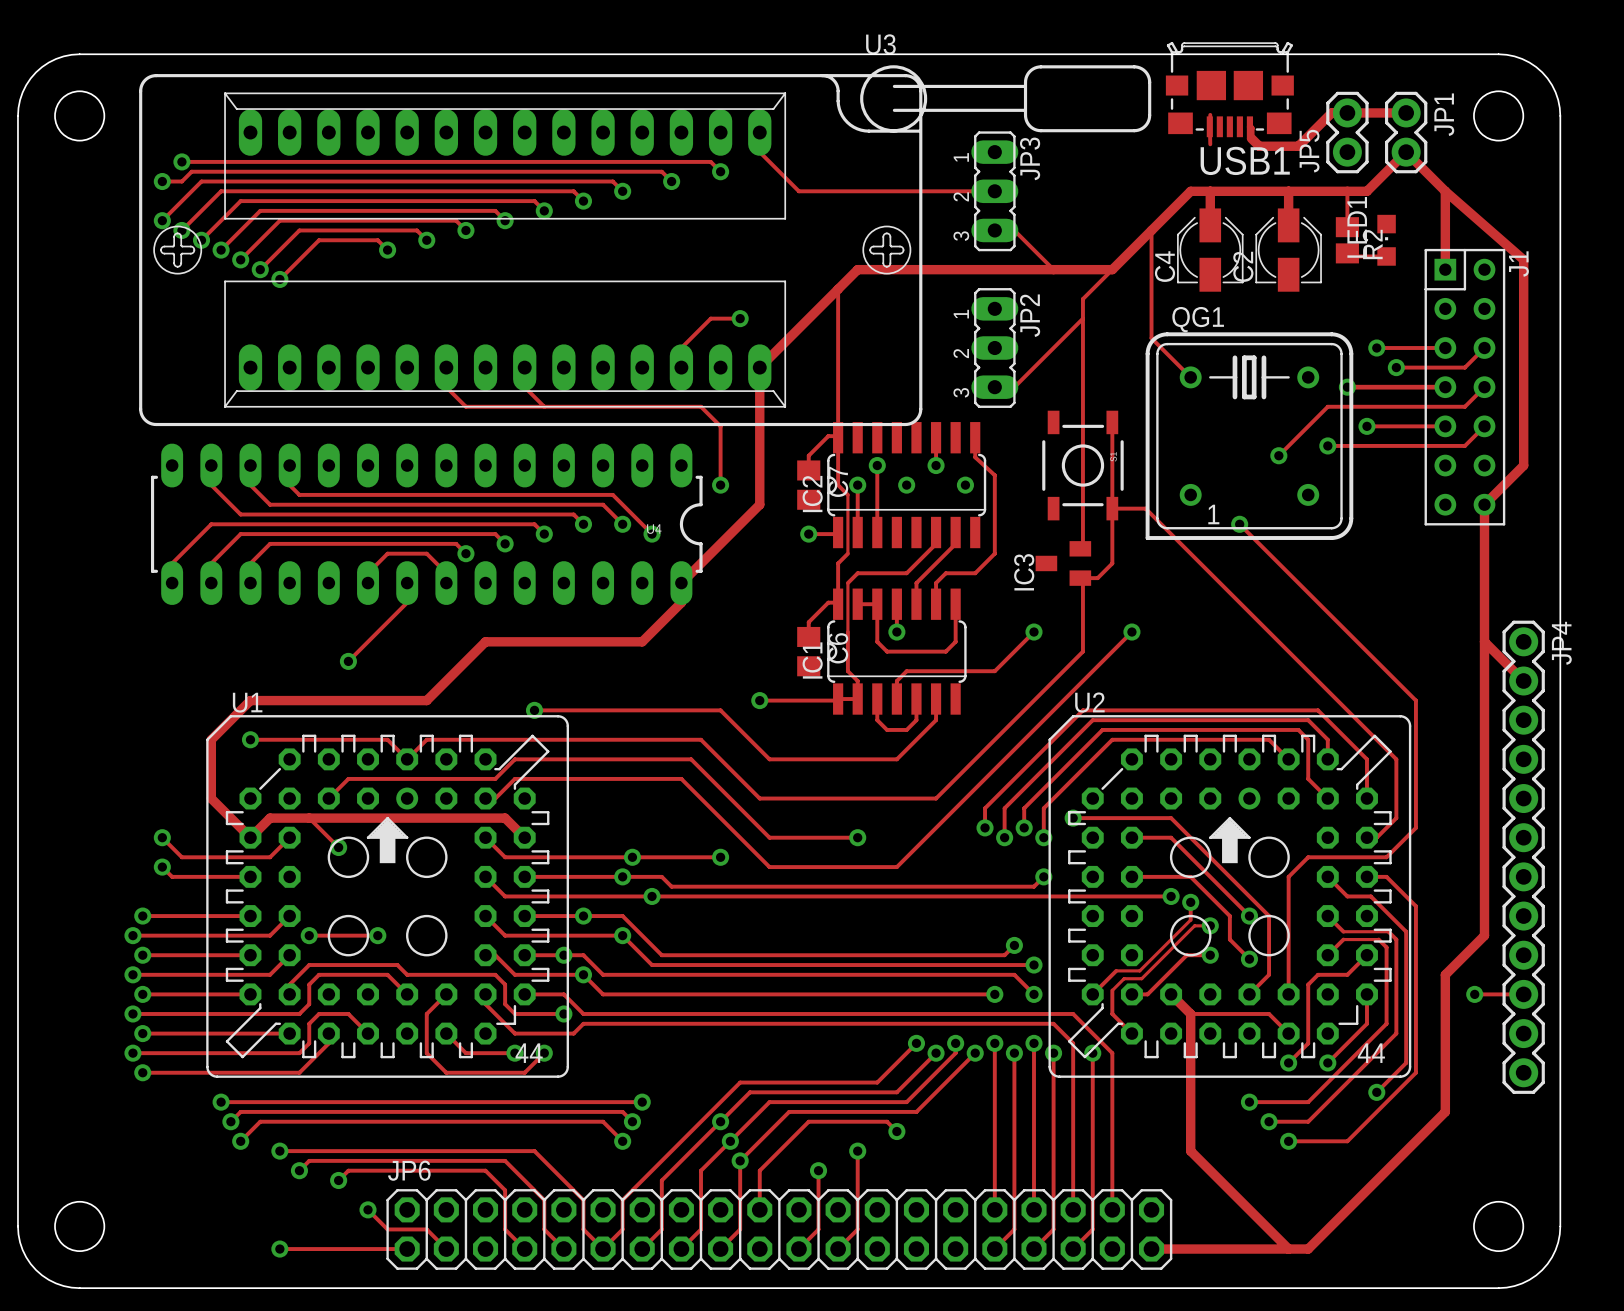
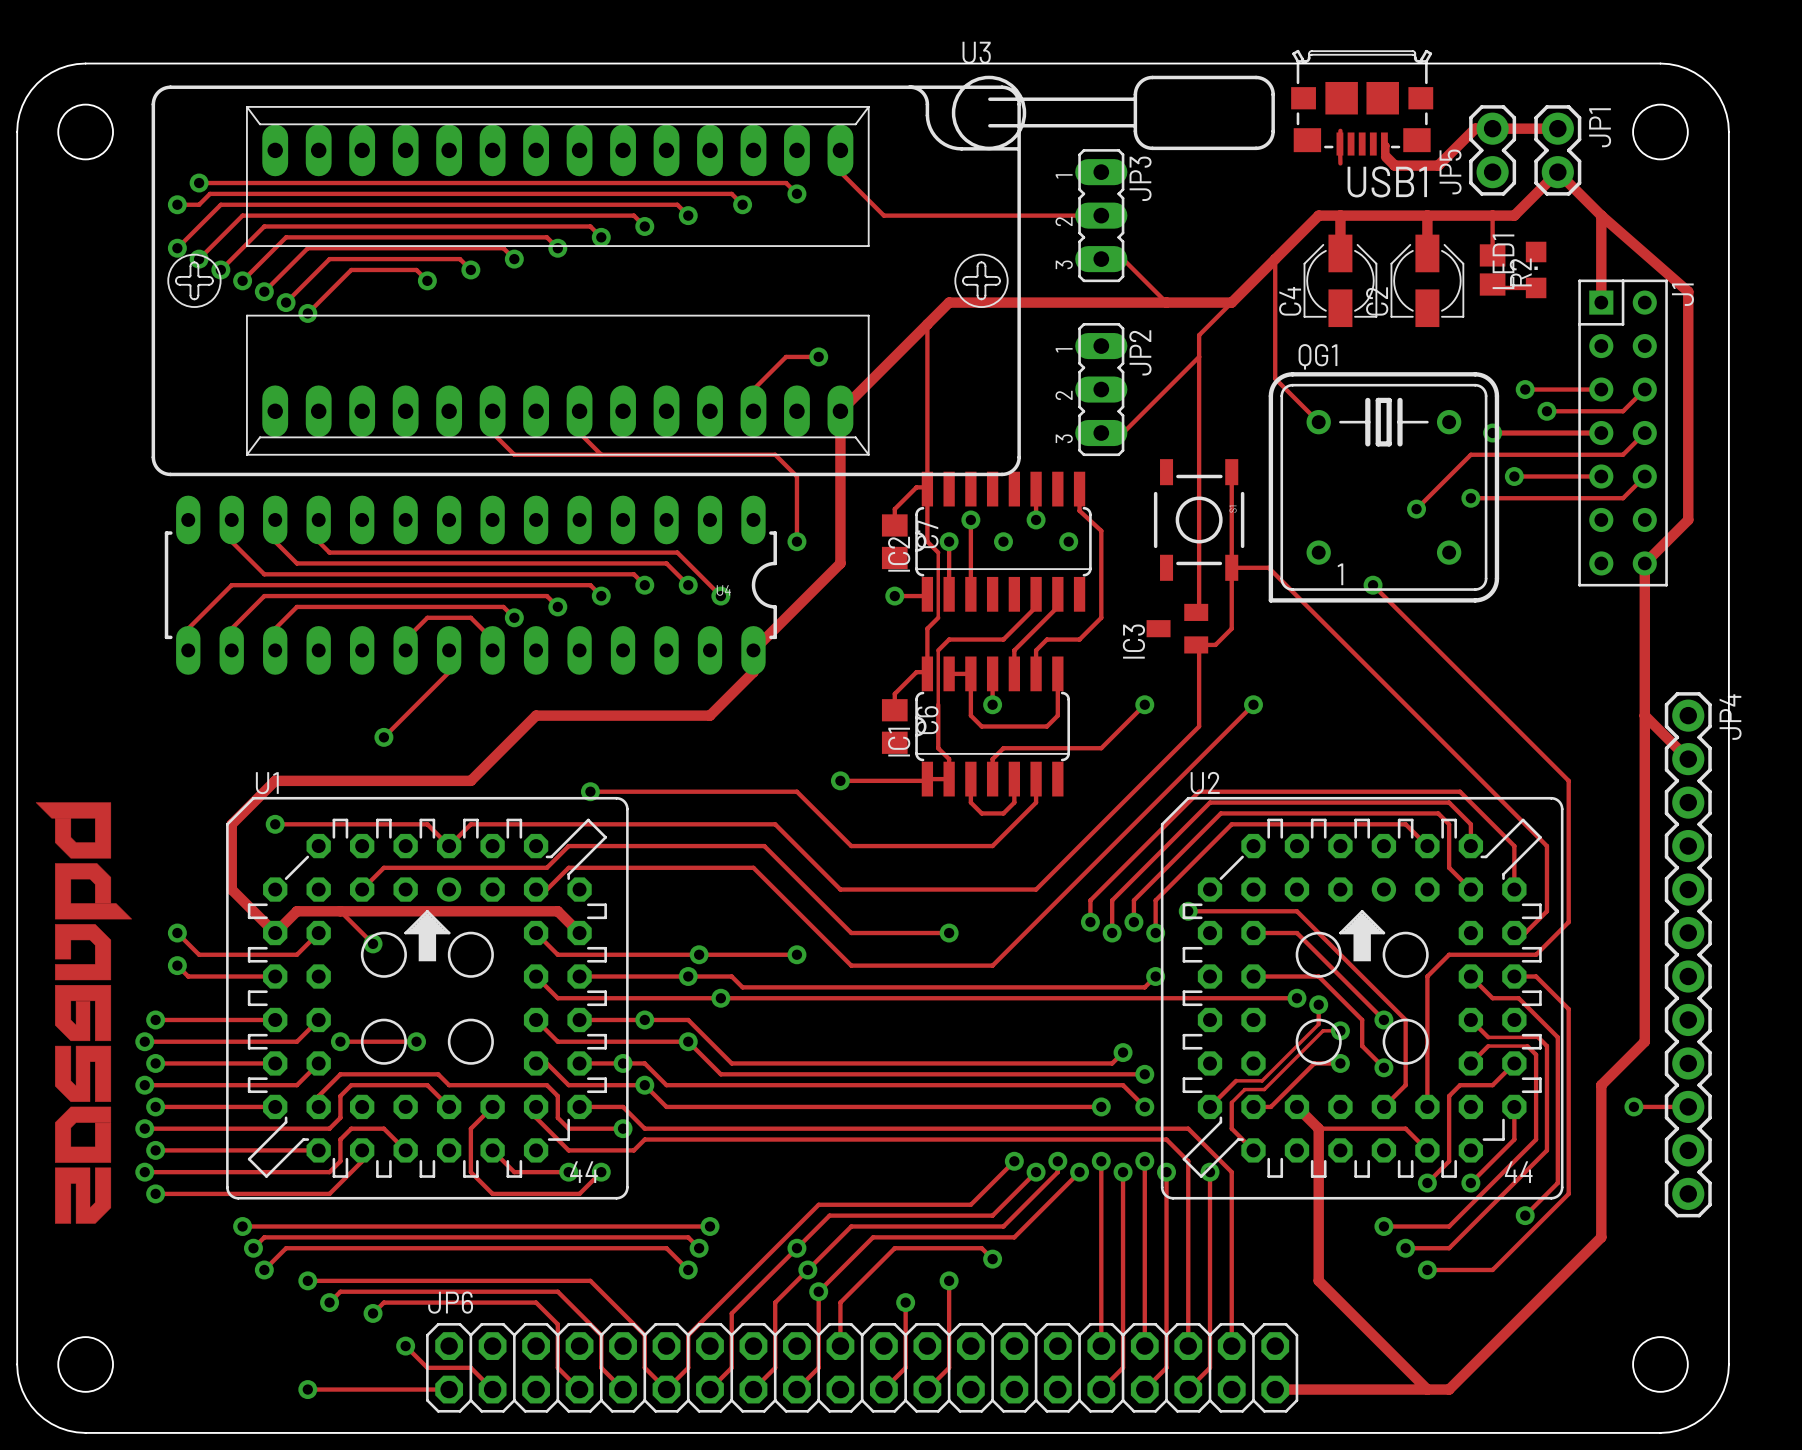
drawing: none -> [35, 802, 132, 1224]

